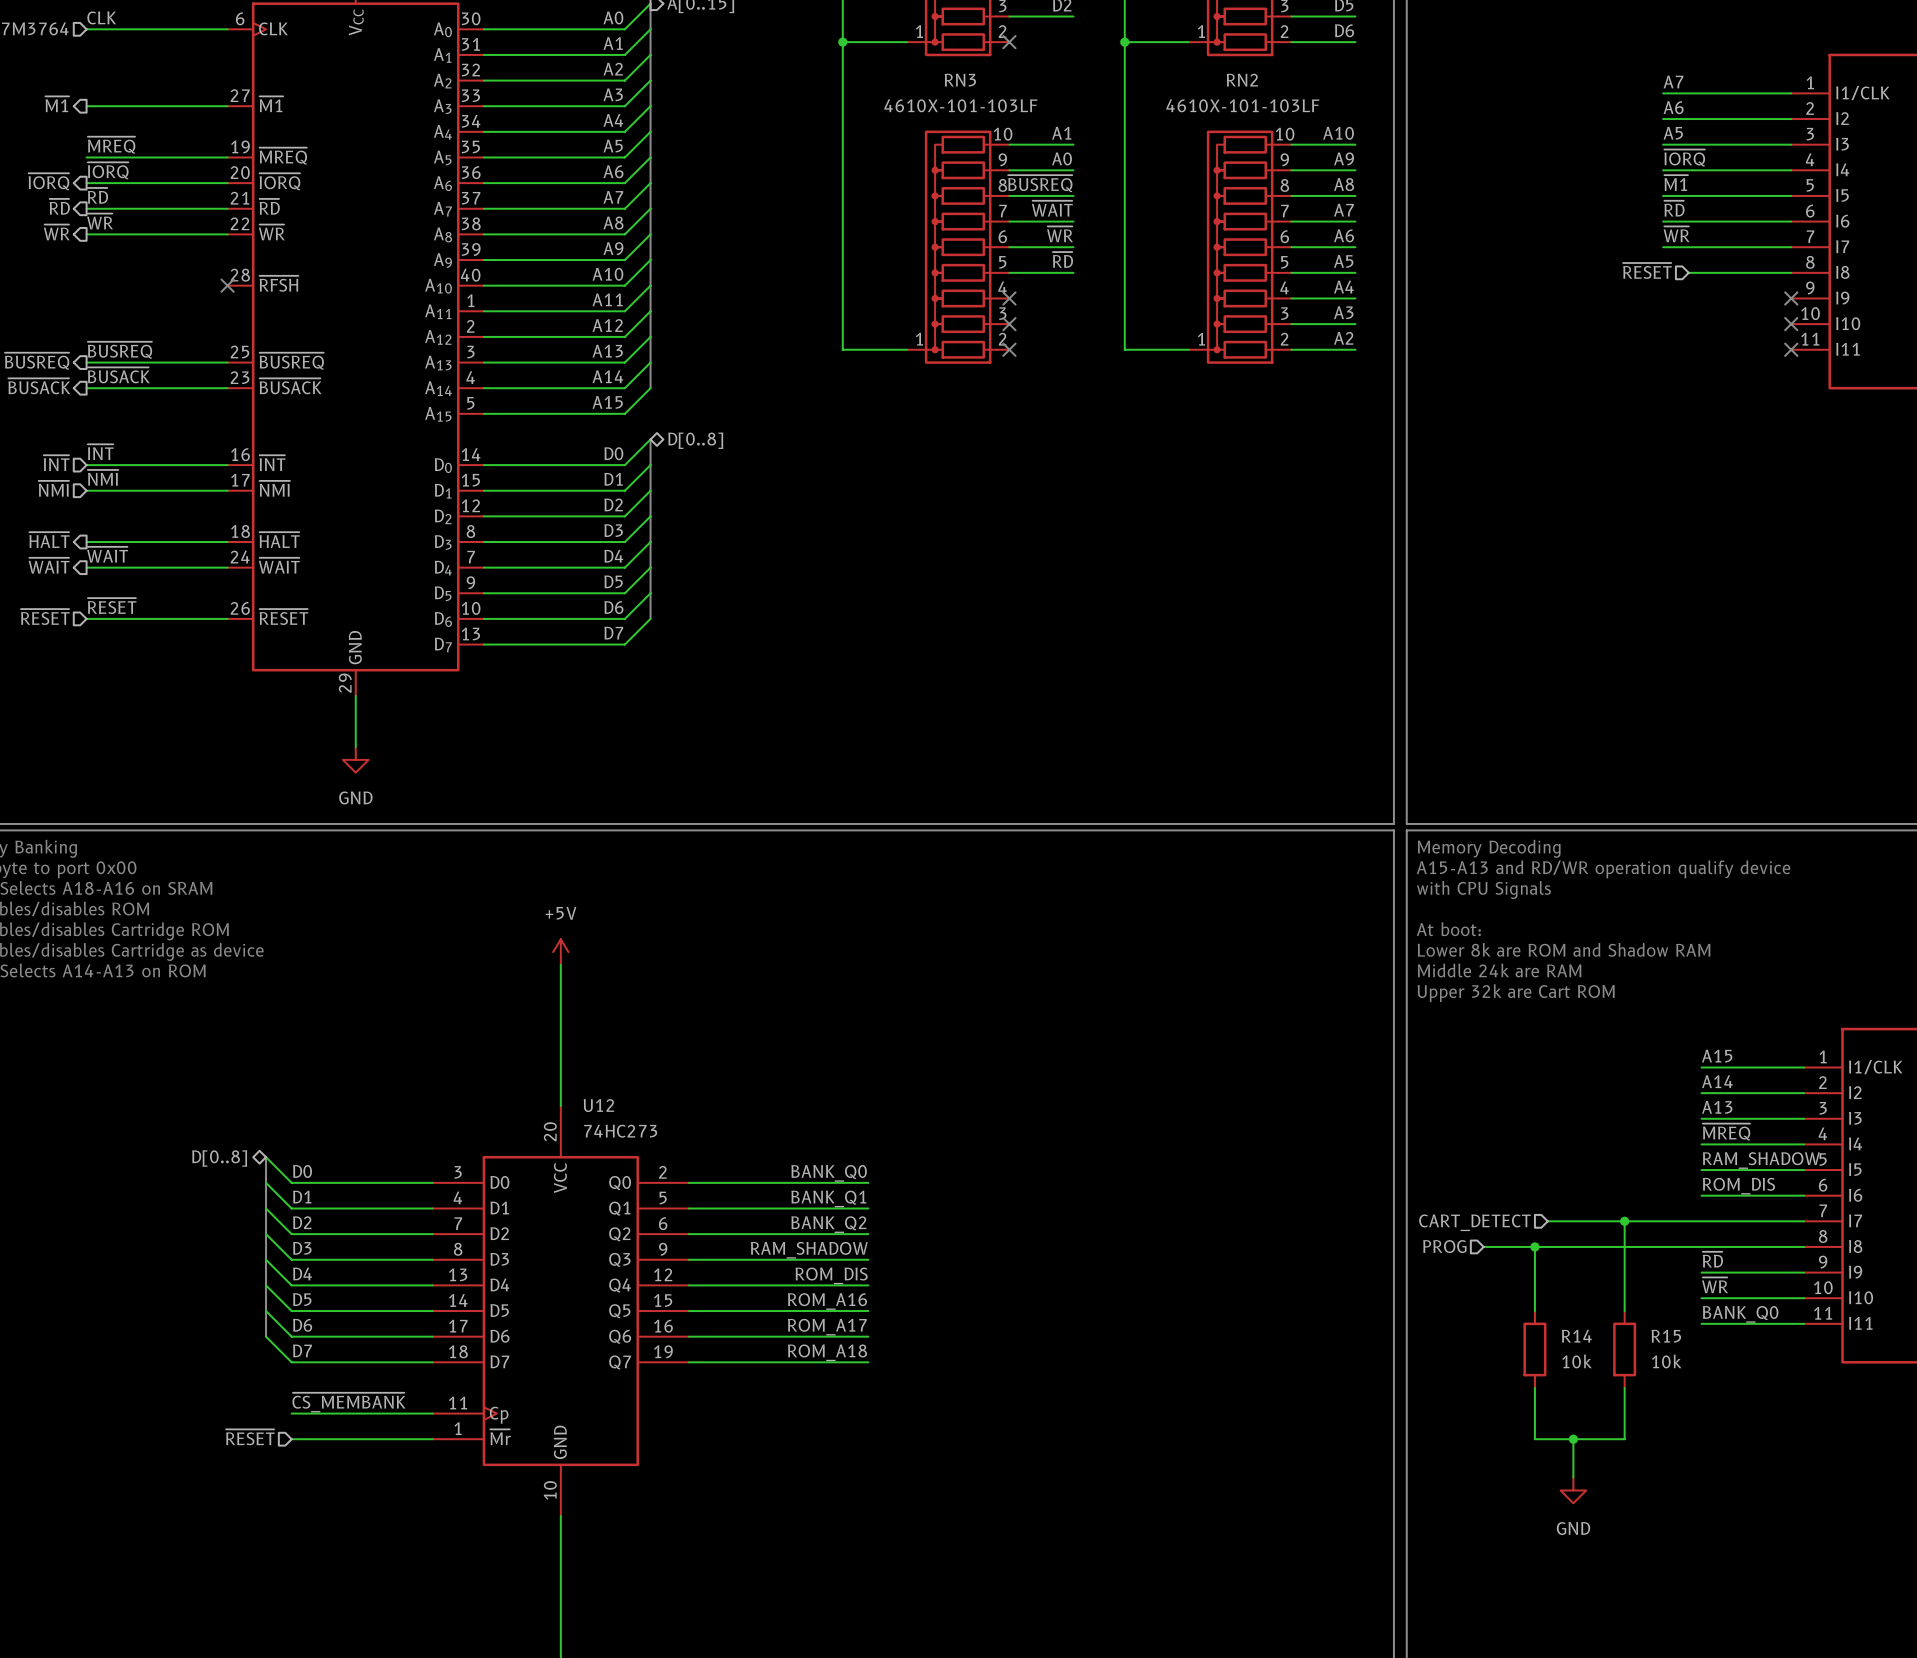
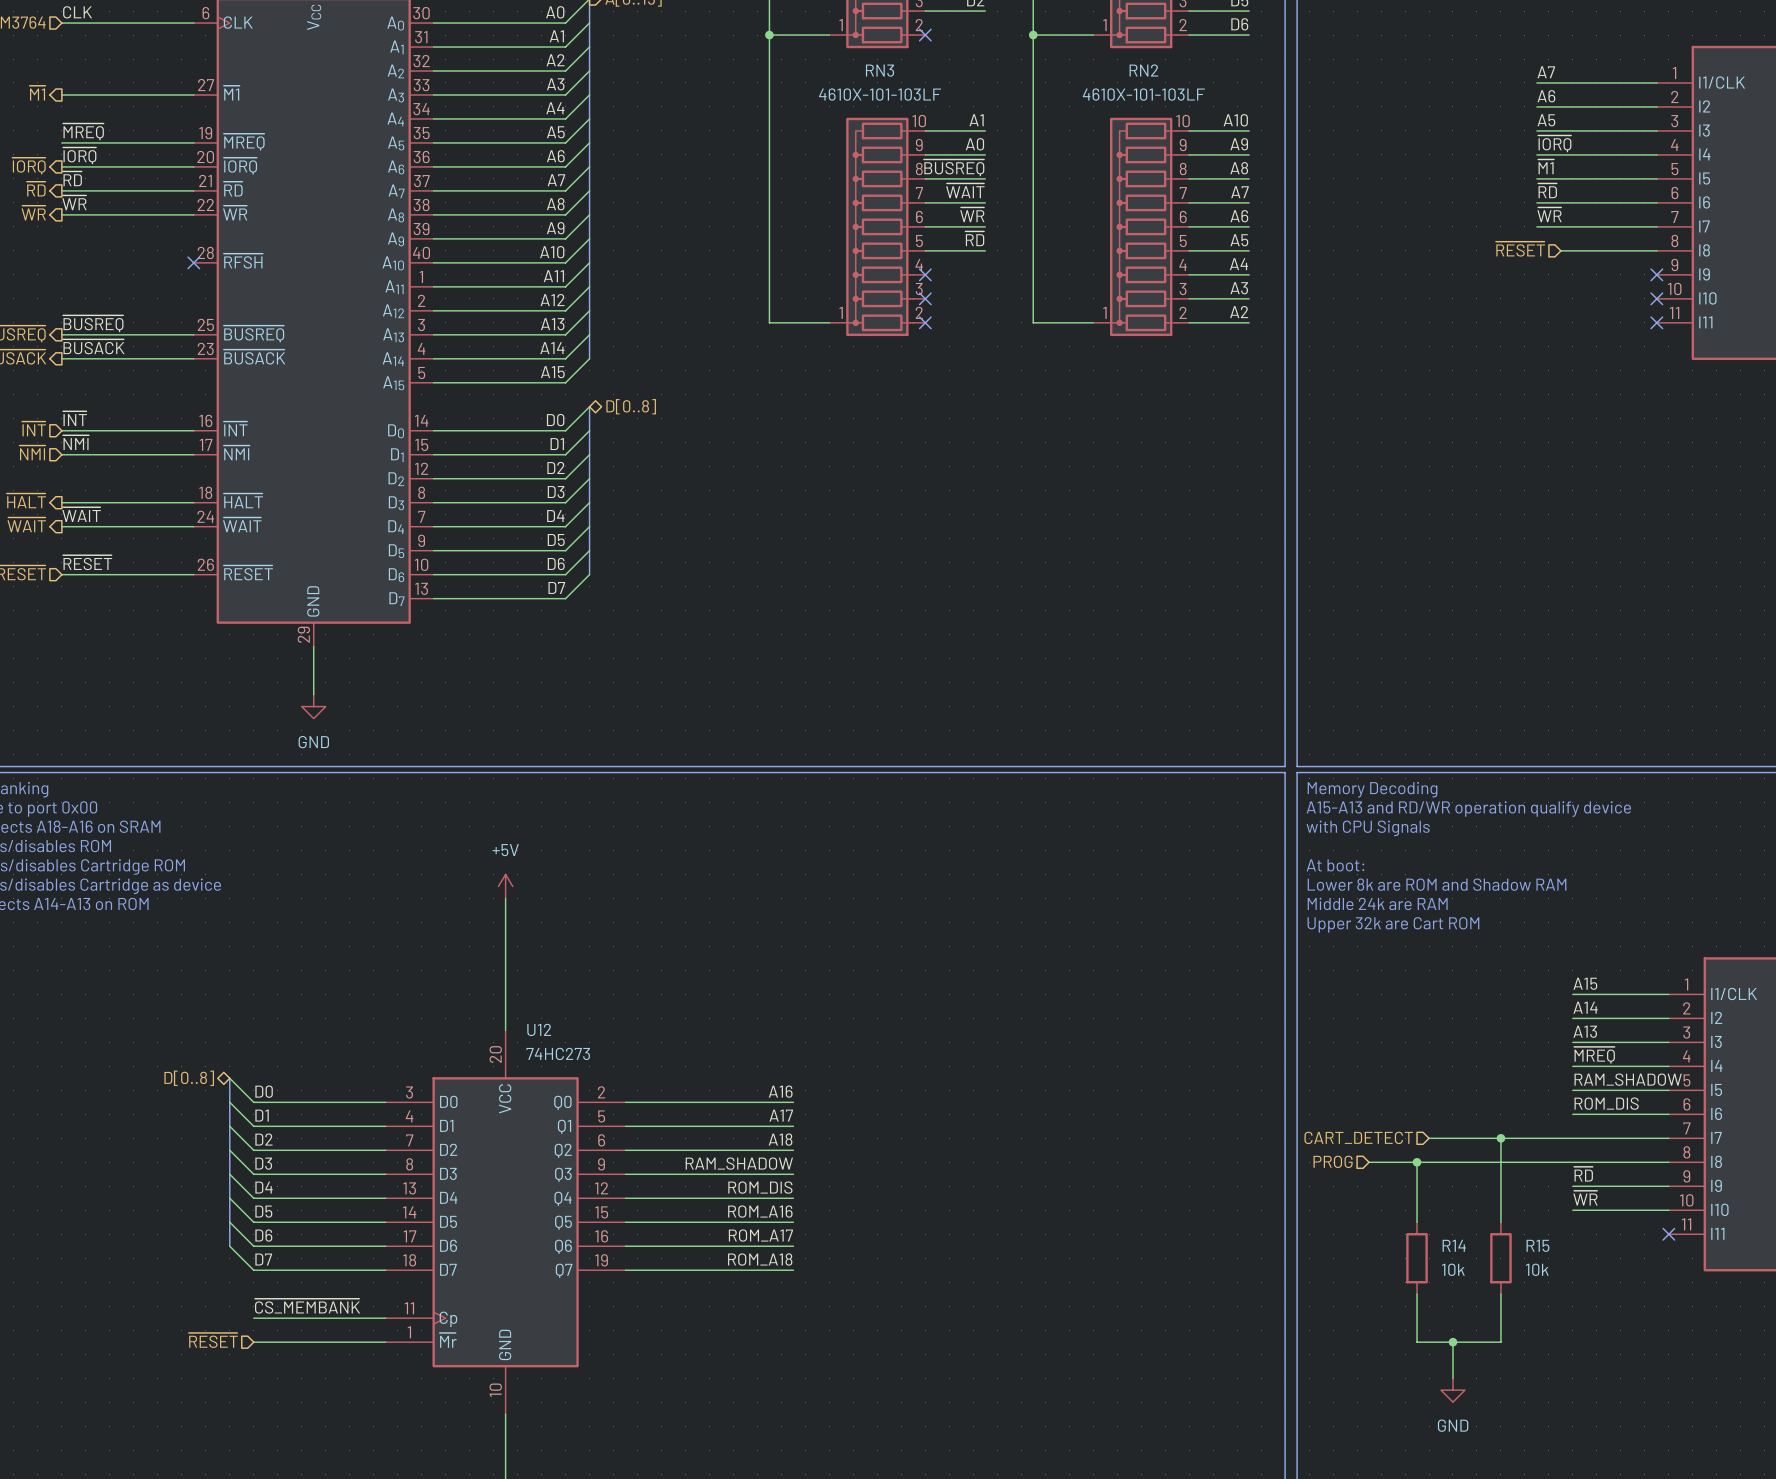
label: BANK_Q0 (829, 1173) -> A16 (780, 1091)
label: BANK_Q1 (828, 1198) -> A17 (781, 1115)
label: BANK_Q2 (828, 1224) -> A18 (780, 1139)
label: BANK_Q0 (1740, 1314) -> none
wire: (1701, 1323) (1804, 1323) -> none
no-connect mark: none -> (1668, 1234)

